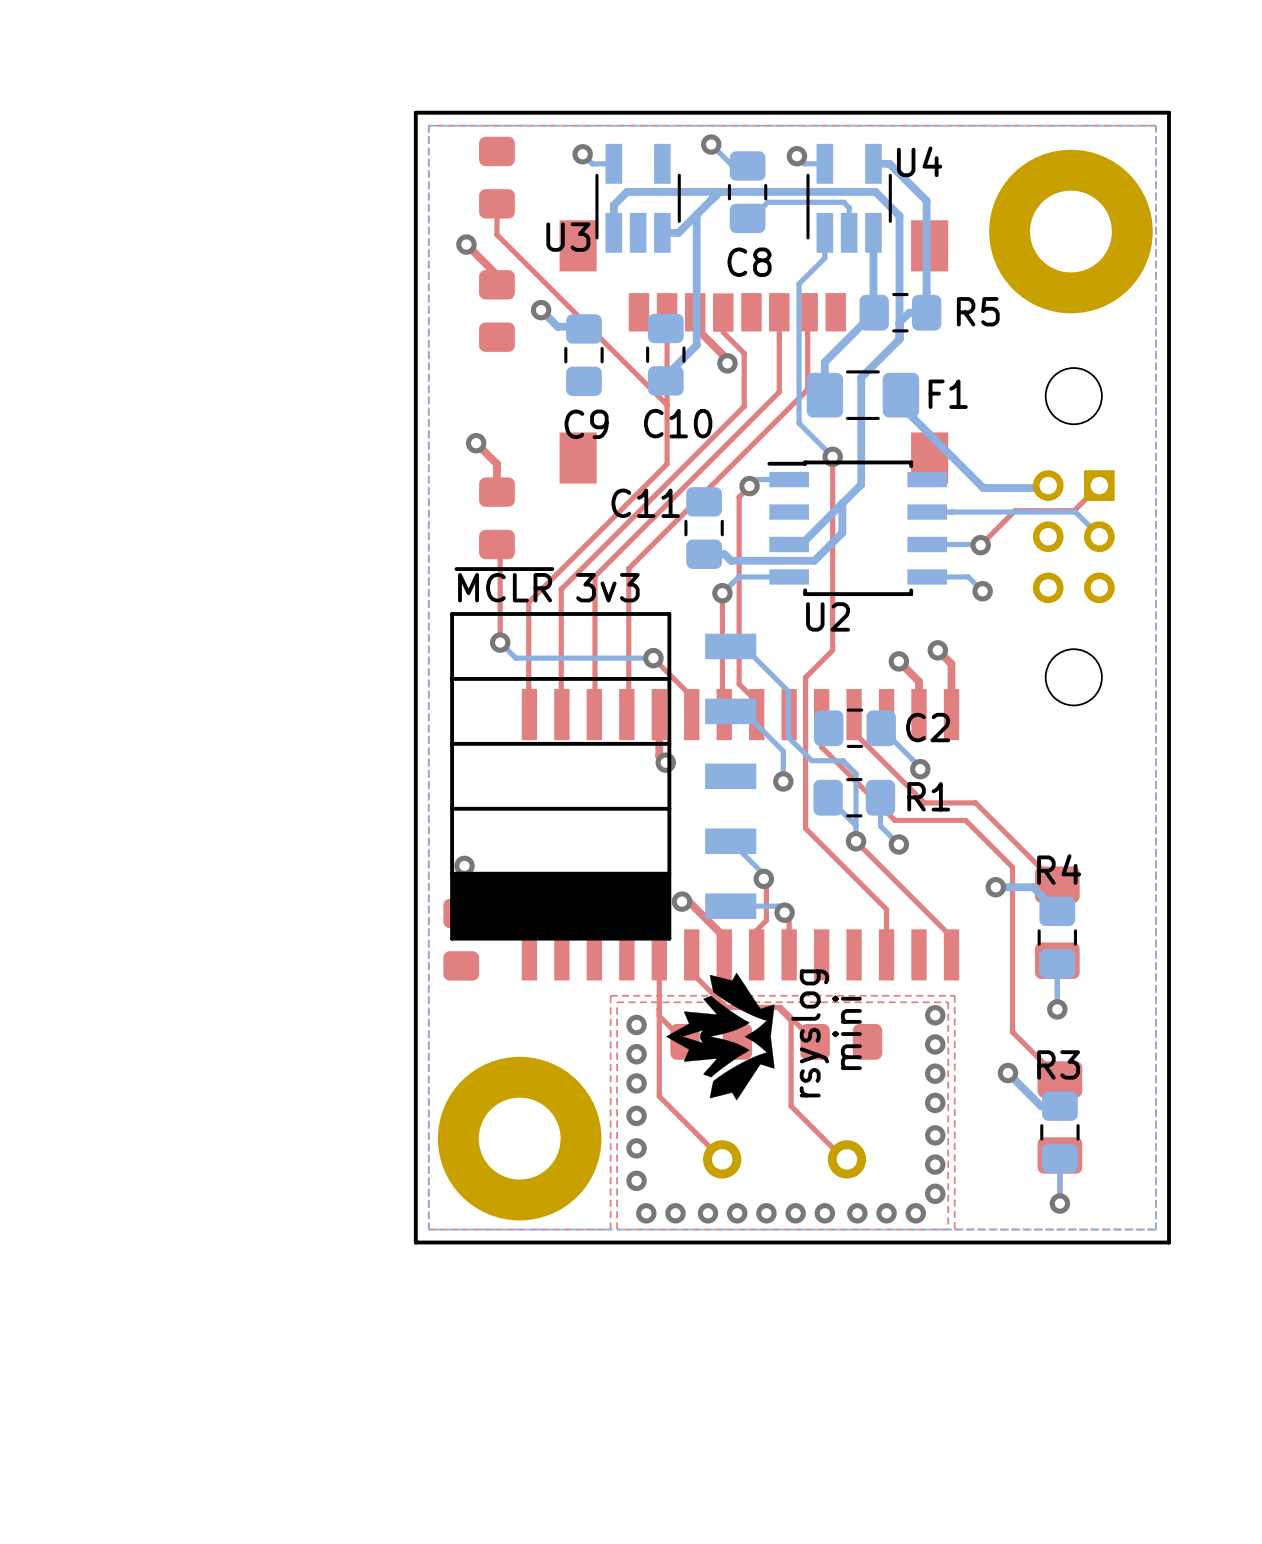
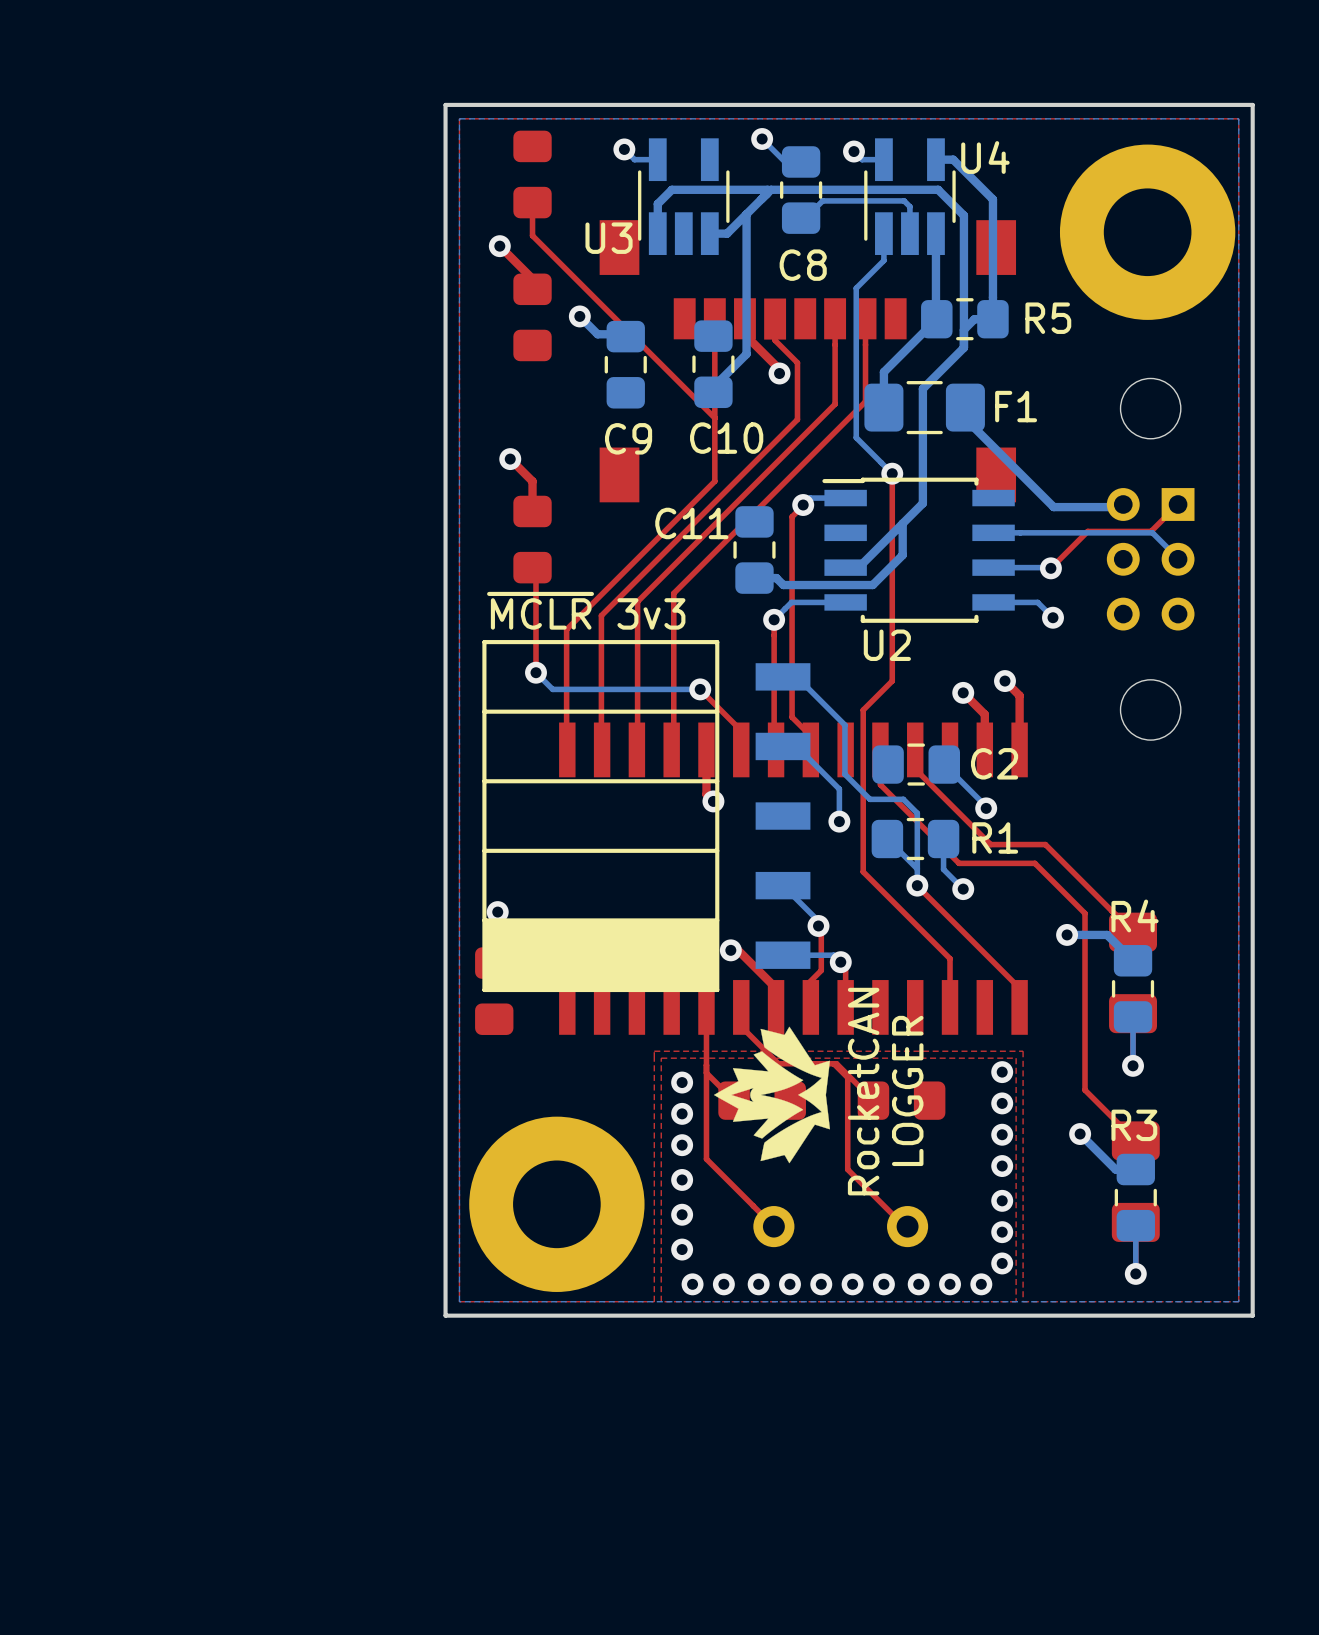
text: mini (847, 1032) -> LOGGER (907, 1090)
text: rsyslog (810, 1033) -> RocketCAN (863, 1091)

